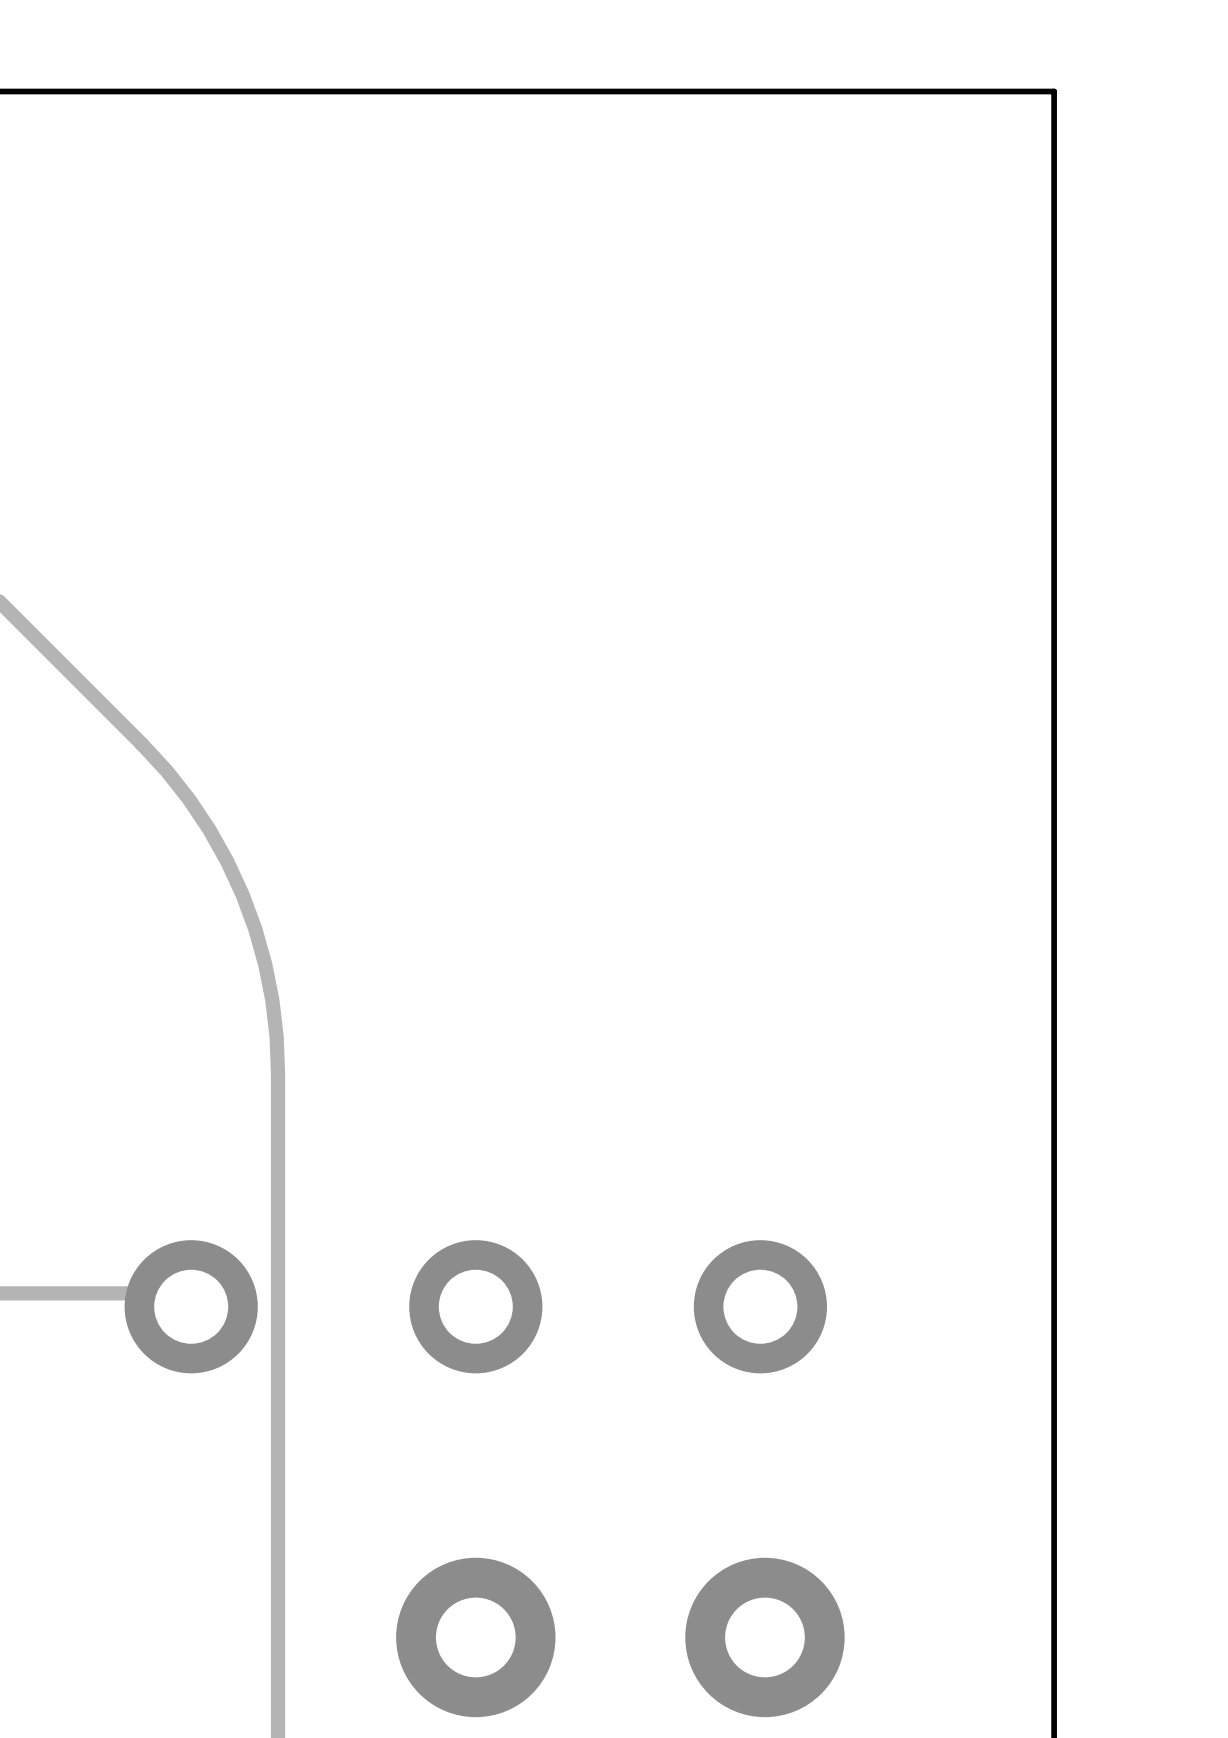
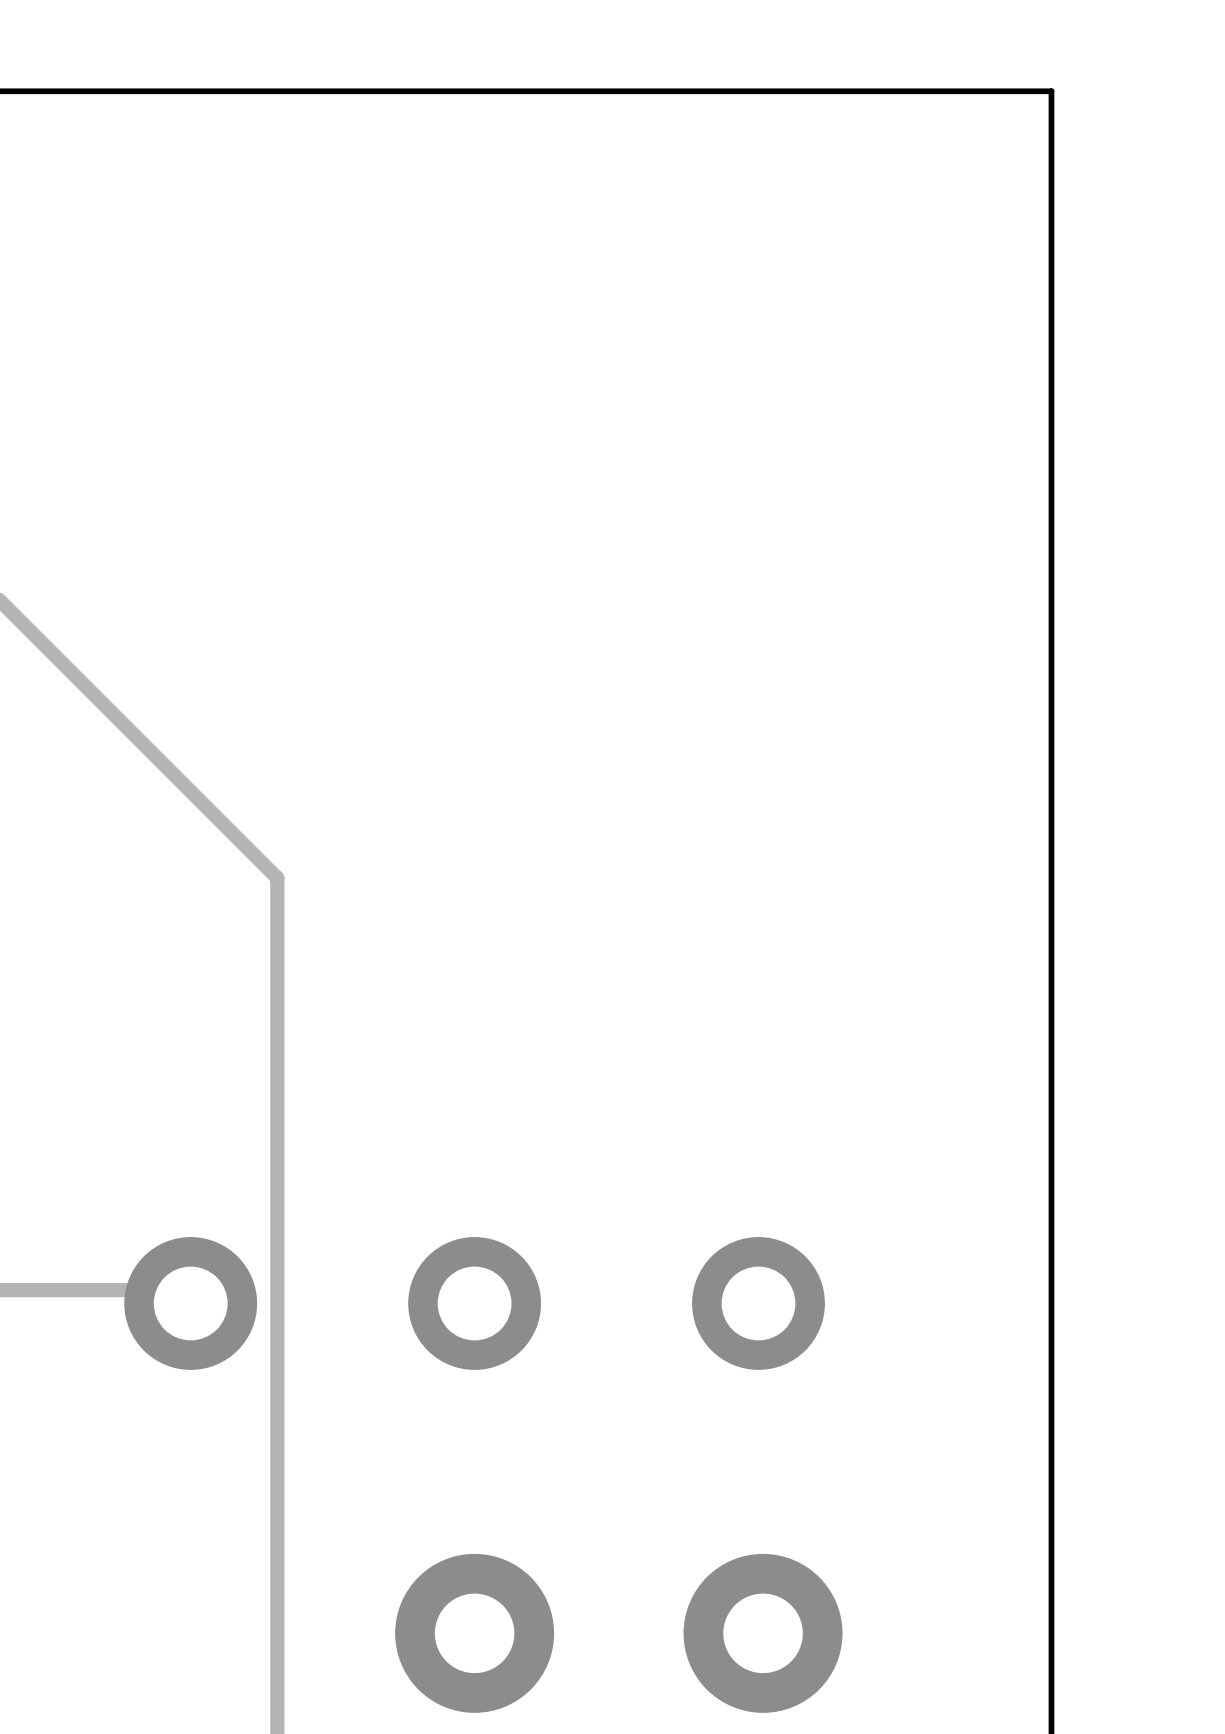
track: (141, 744) (166, 770) (209, 829) (242, 894) (265, 964) (272, 1000) (278, 1072) -> (141, 742) (277, 878) (277, 1070)

